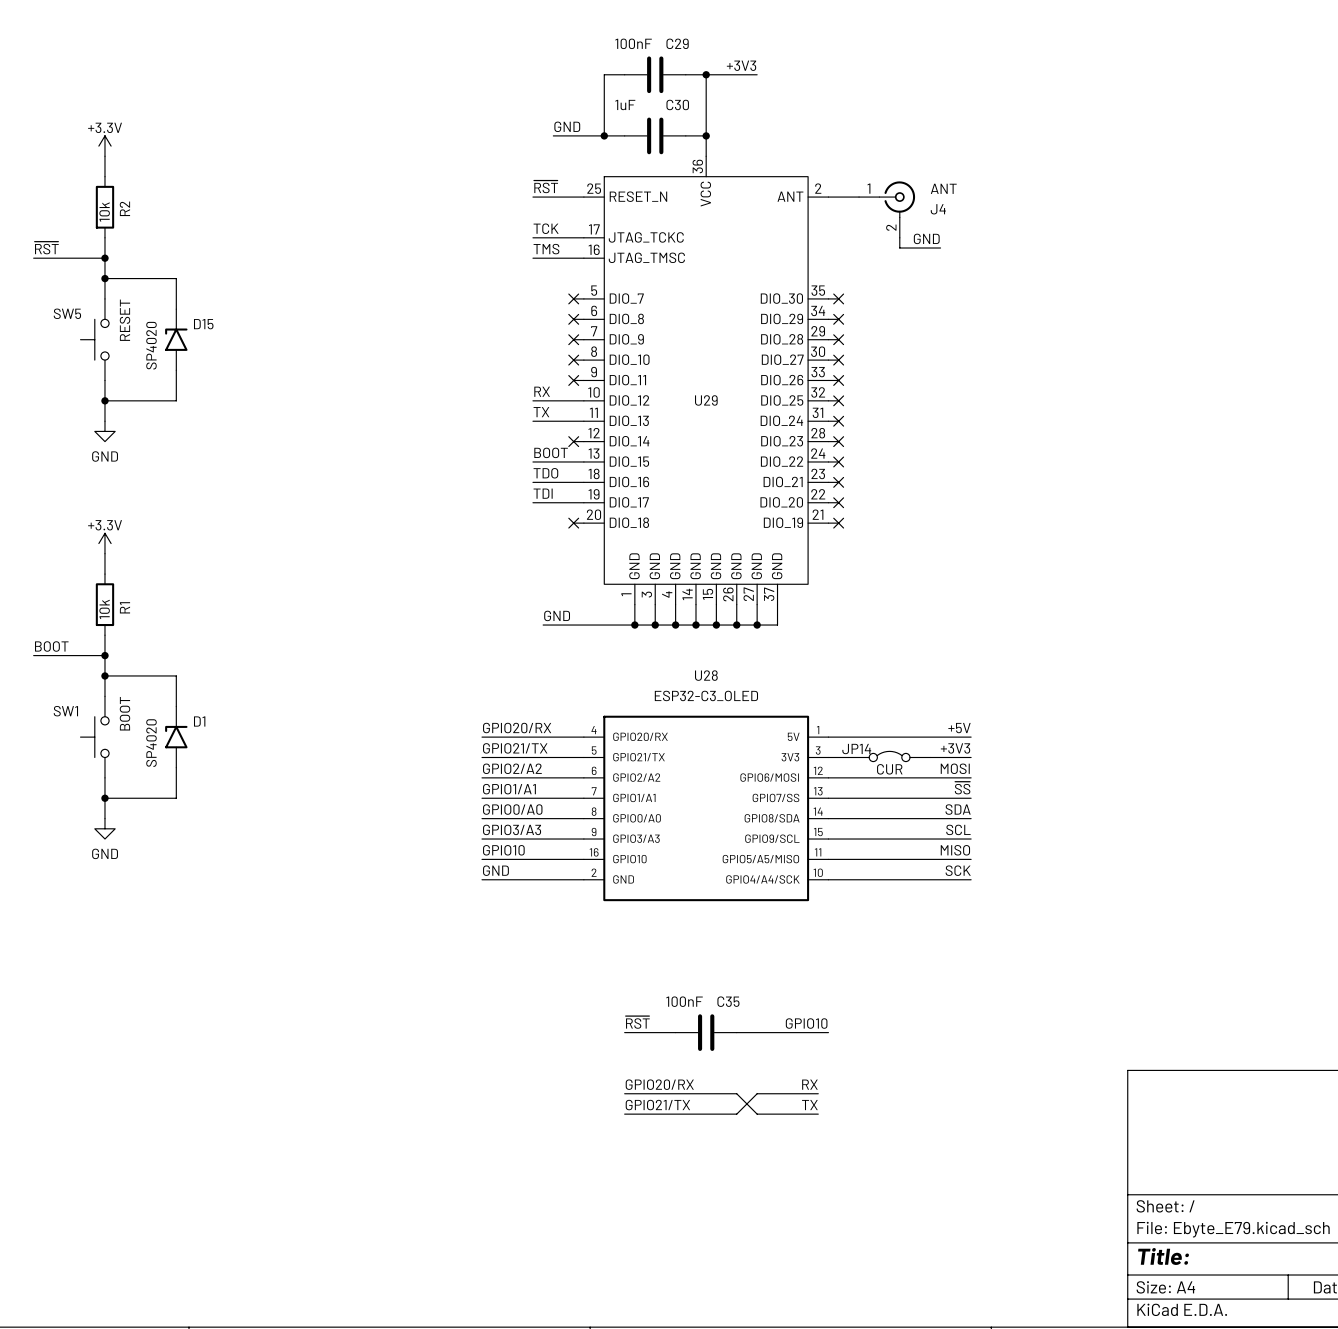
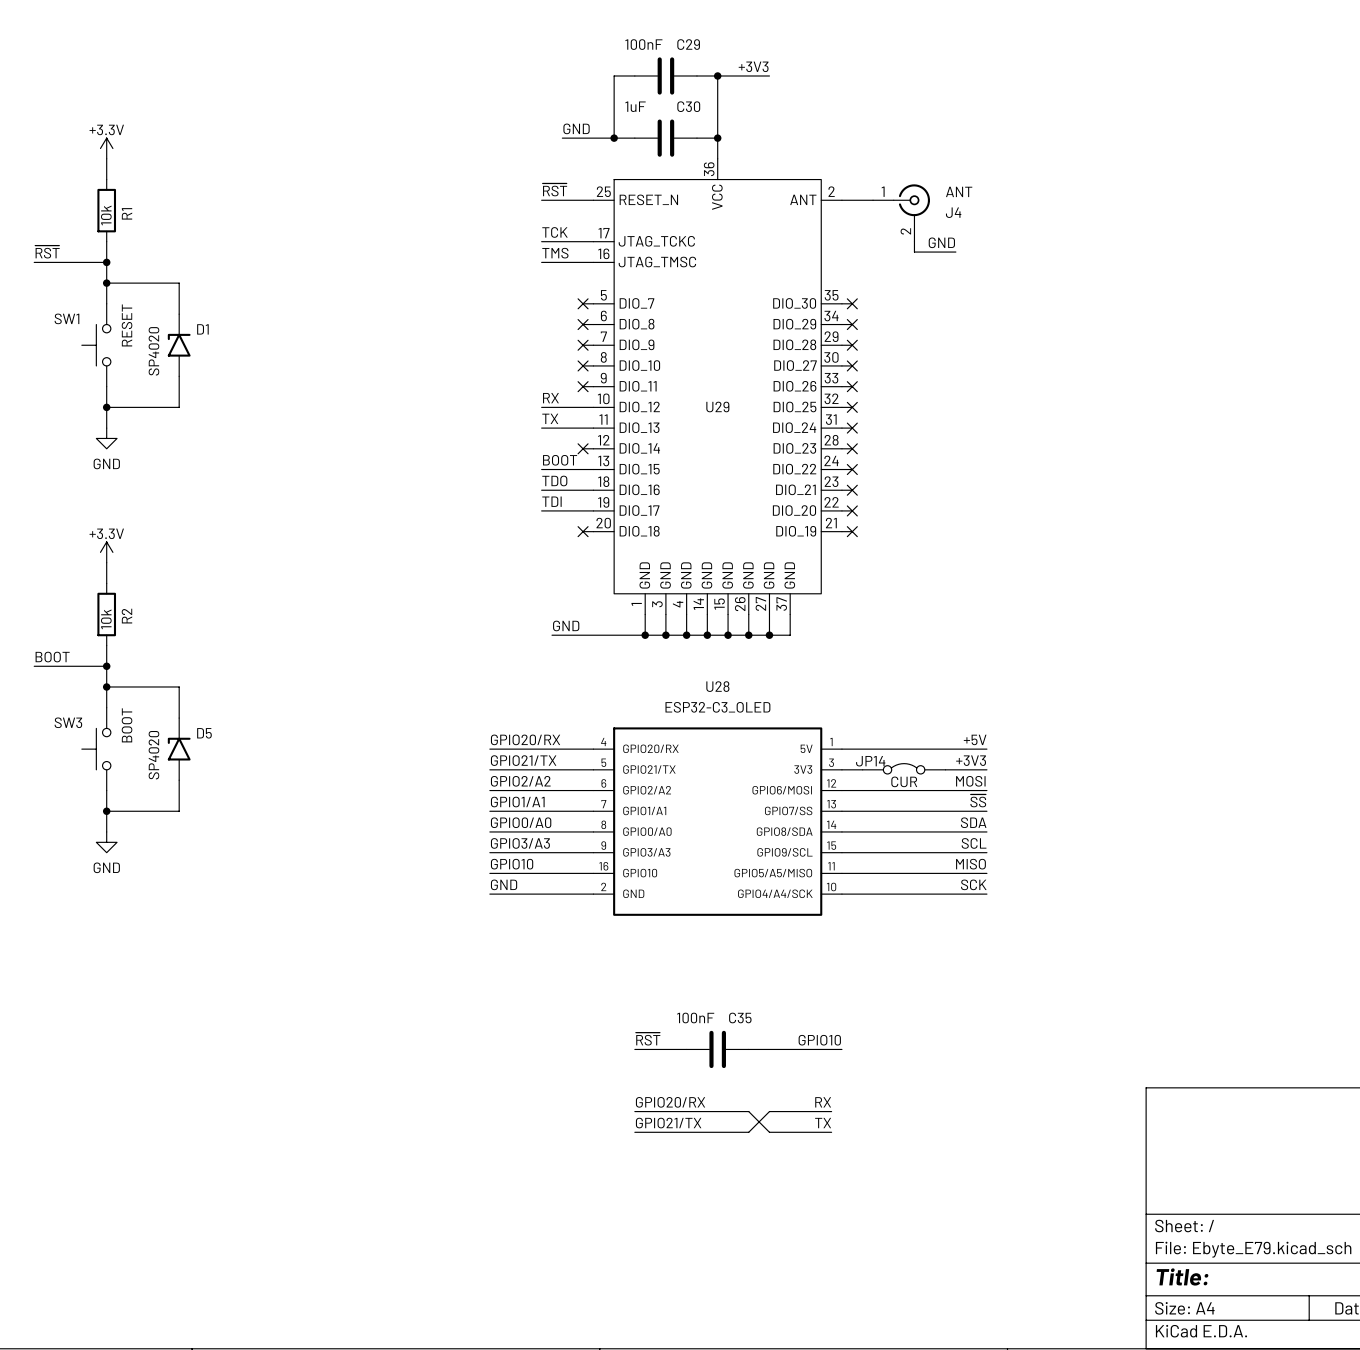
R2 name: R2 (124, 208) -> R1 (127, 213)
SW5 name: SW5 (67, 313) -> SW1 (66, 318)
D15 name: D15 (203, 324) -> D1 (202, 329)
R1 name: R1 (124, 607) -> R2 (126, 616)
SW1 name: SW1 (65, 711) -> SW3 (68, 722)
D1 name: D1 (199, 721) -> D5 (204, 733)

